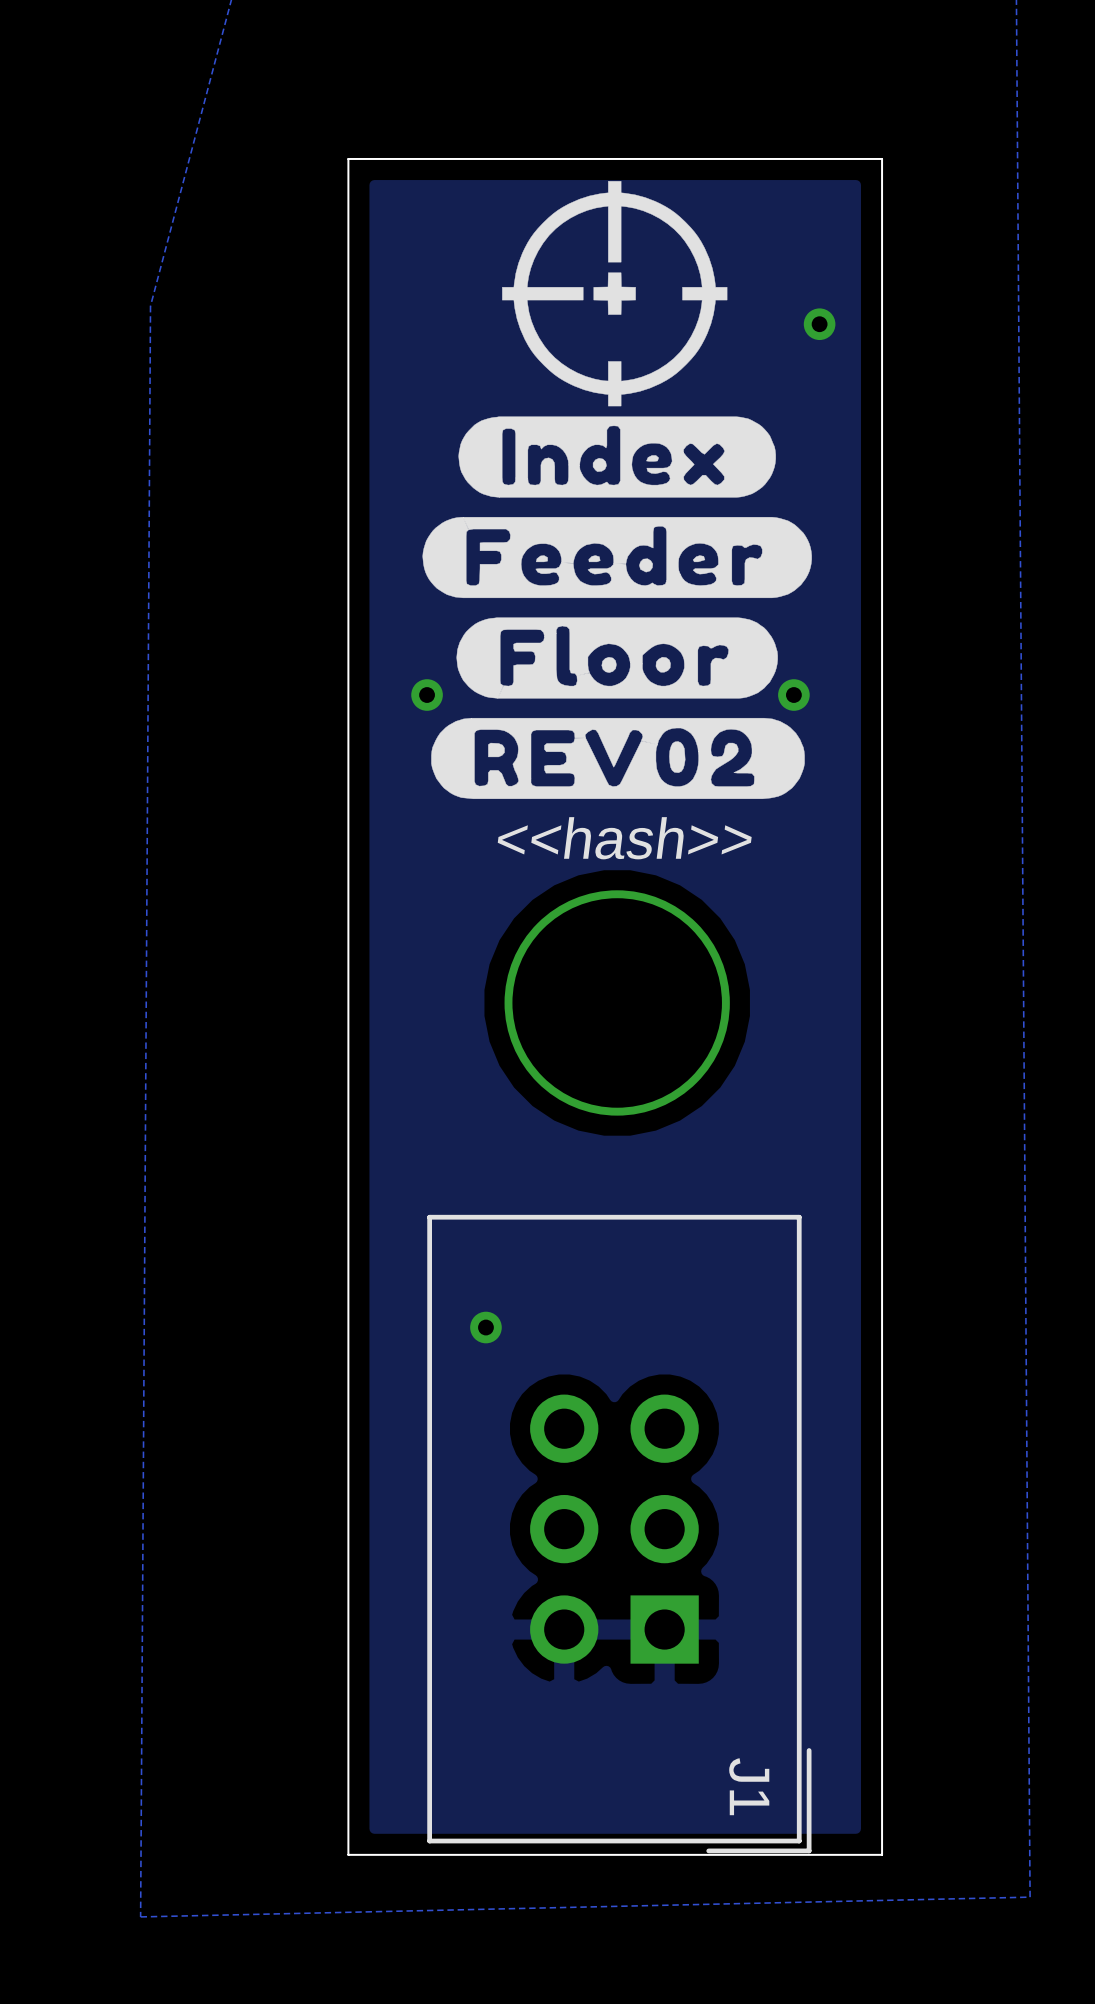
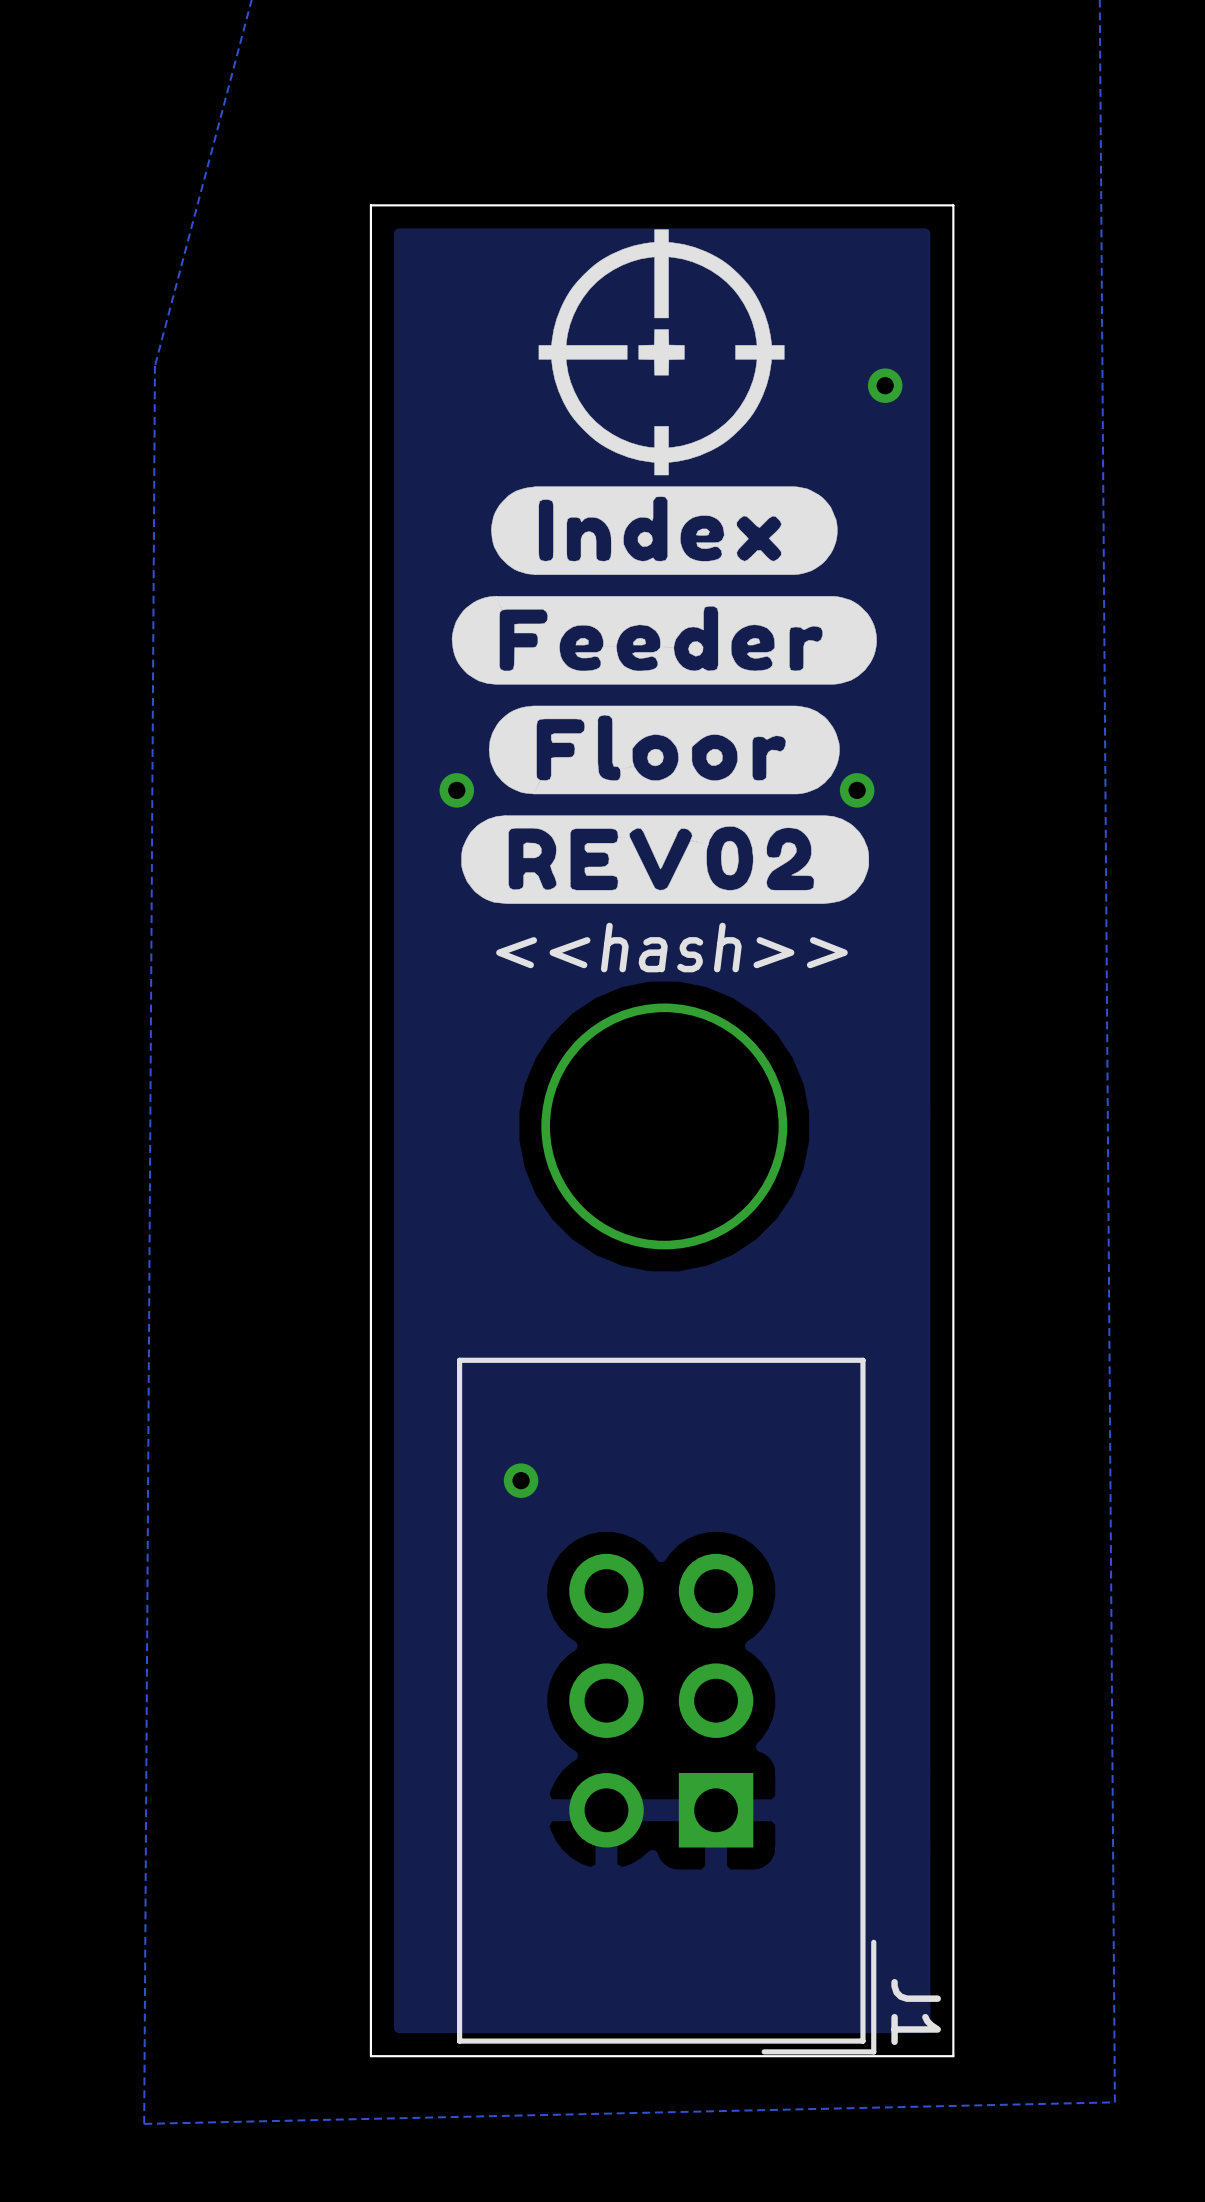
J1 name position: J1 (749, 1786) -> J1 (916, 2012)

